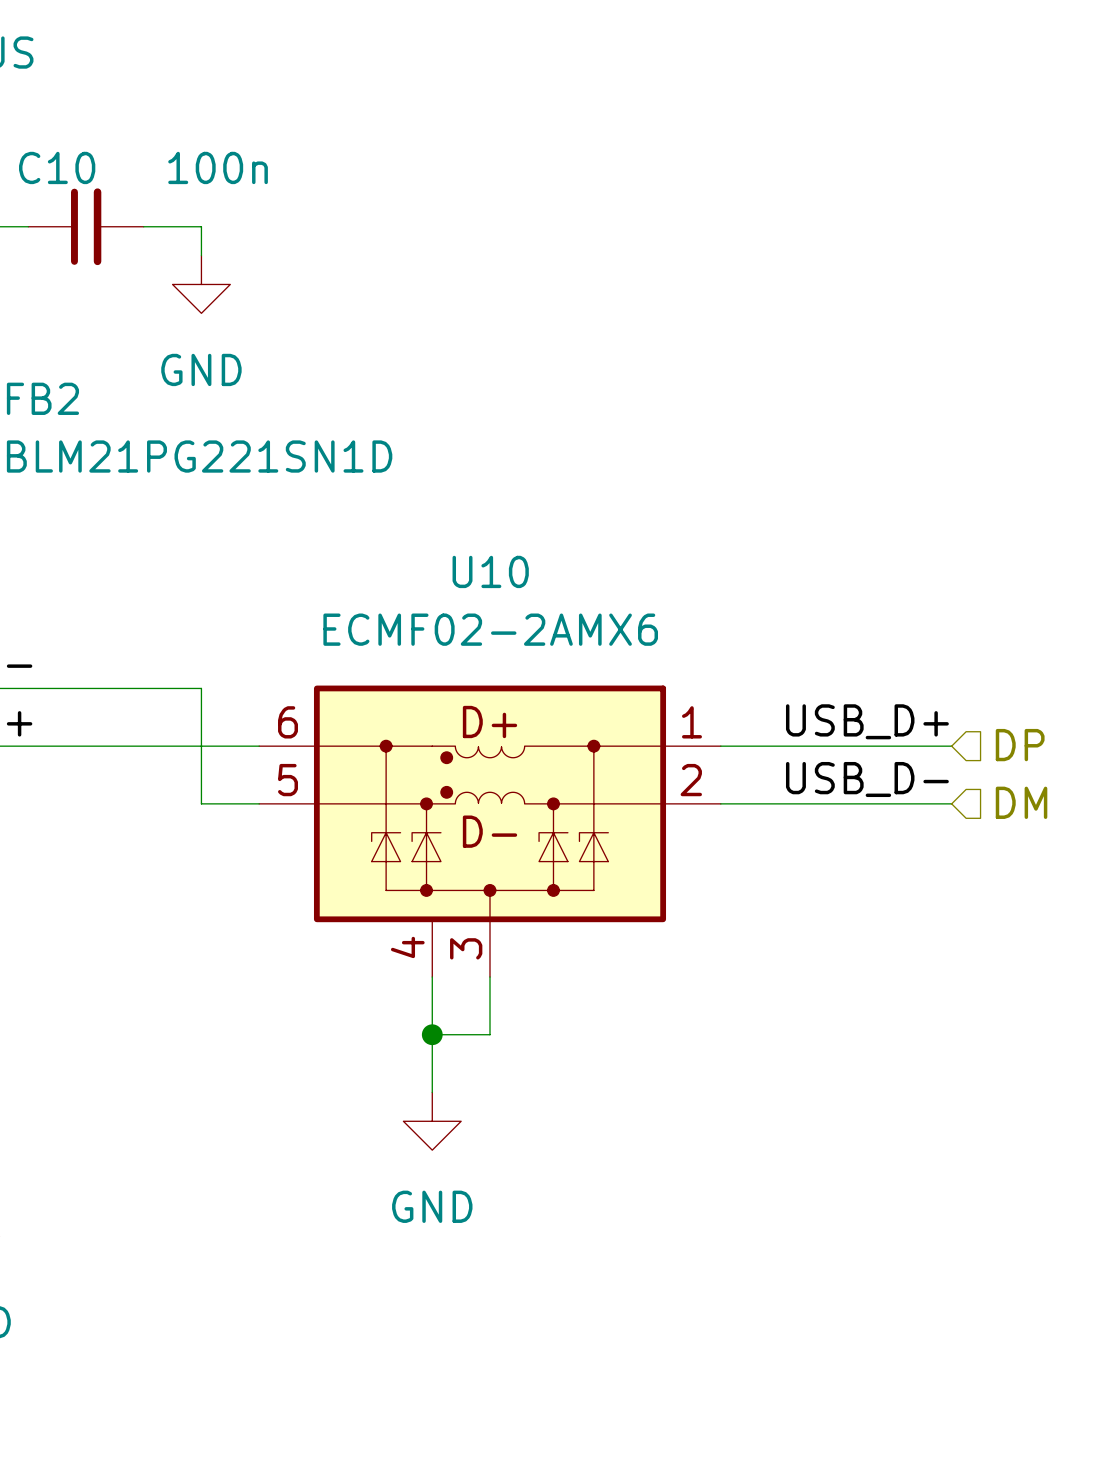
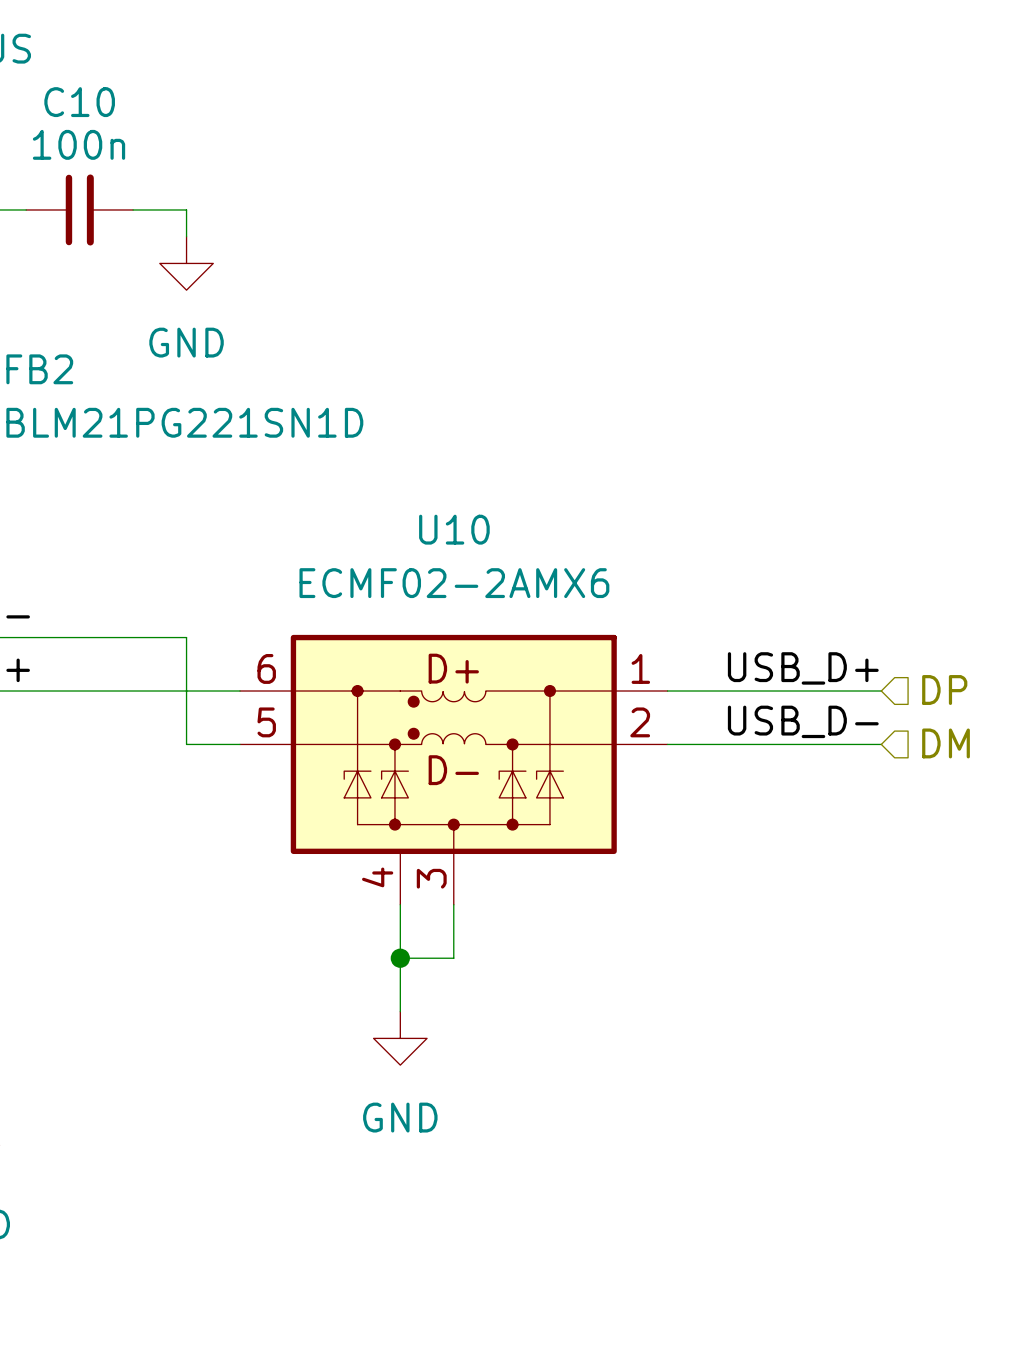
C10 name position: C10 (57, 167) -> C10 (79, 102)
C10 value position: 100n (218, 167) -> 100n (79, 144)

